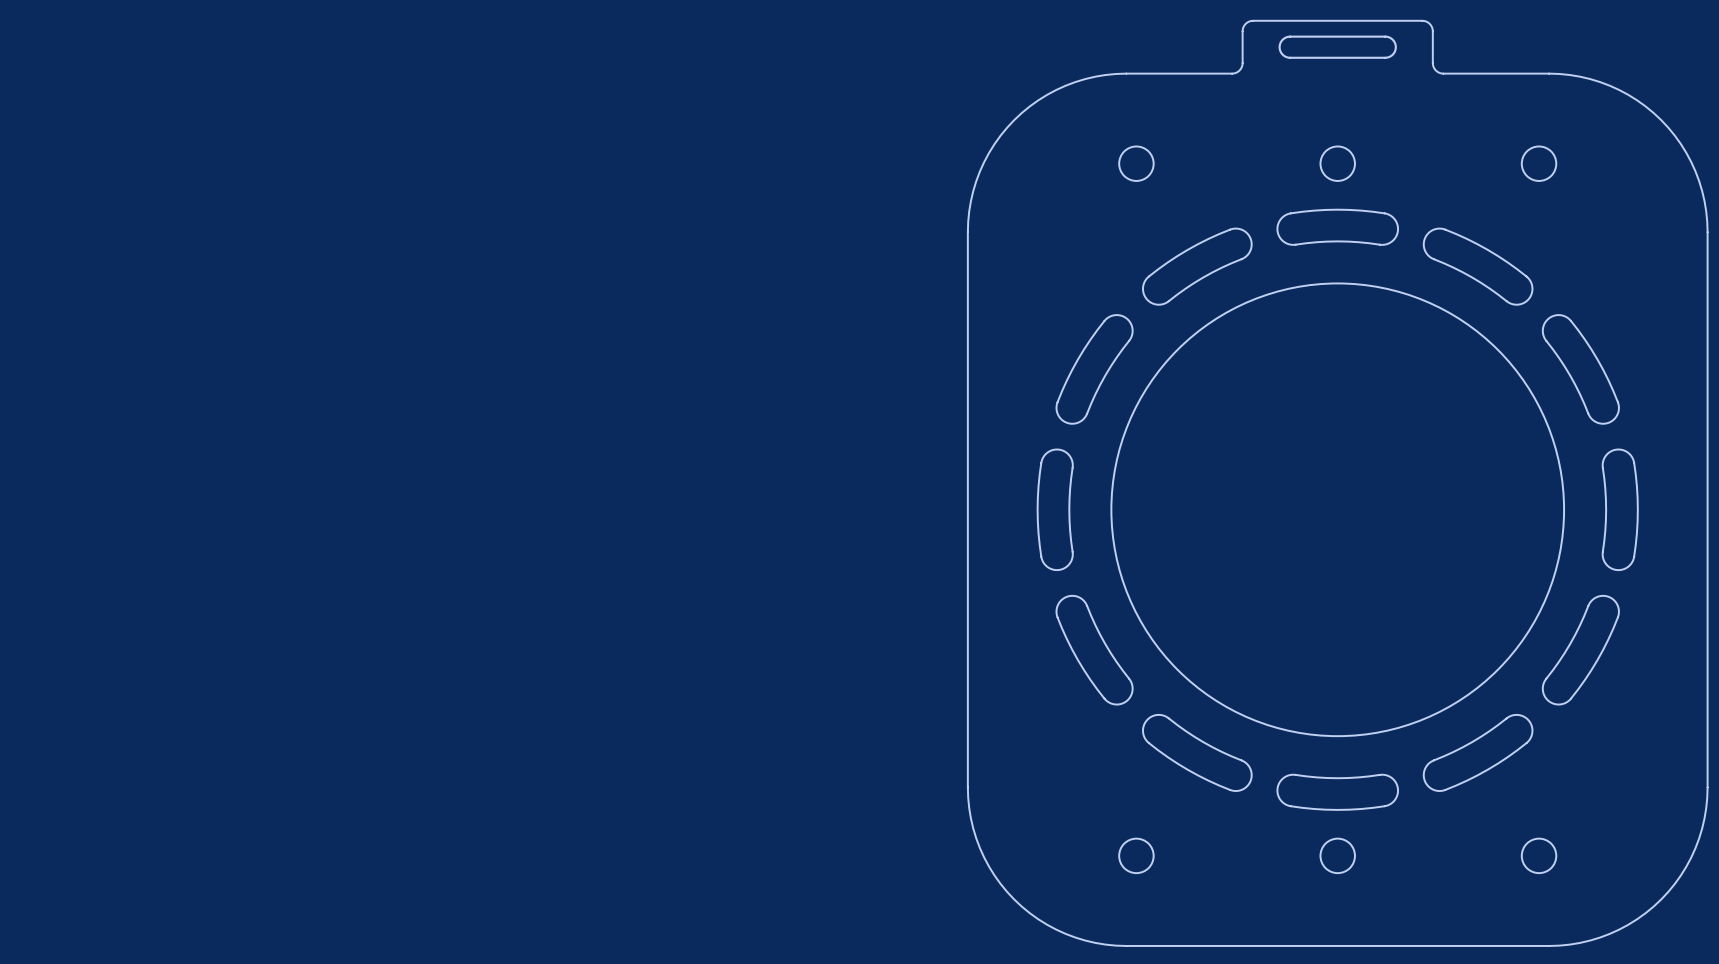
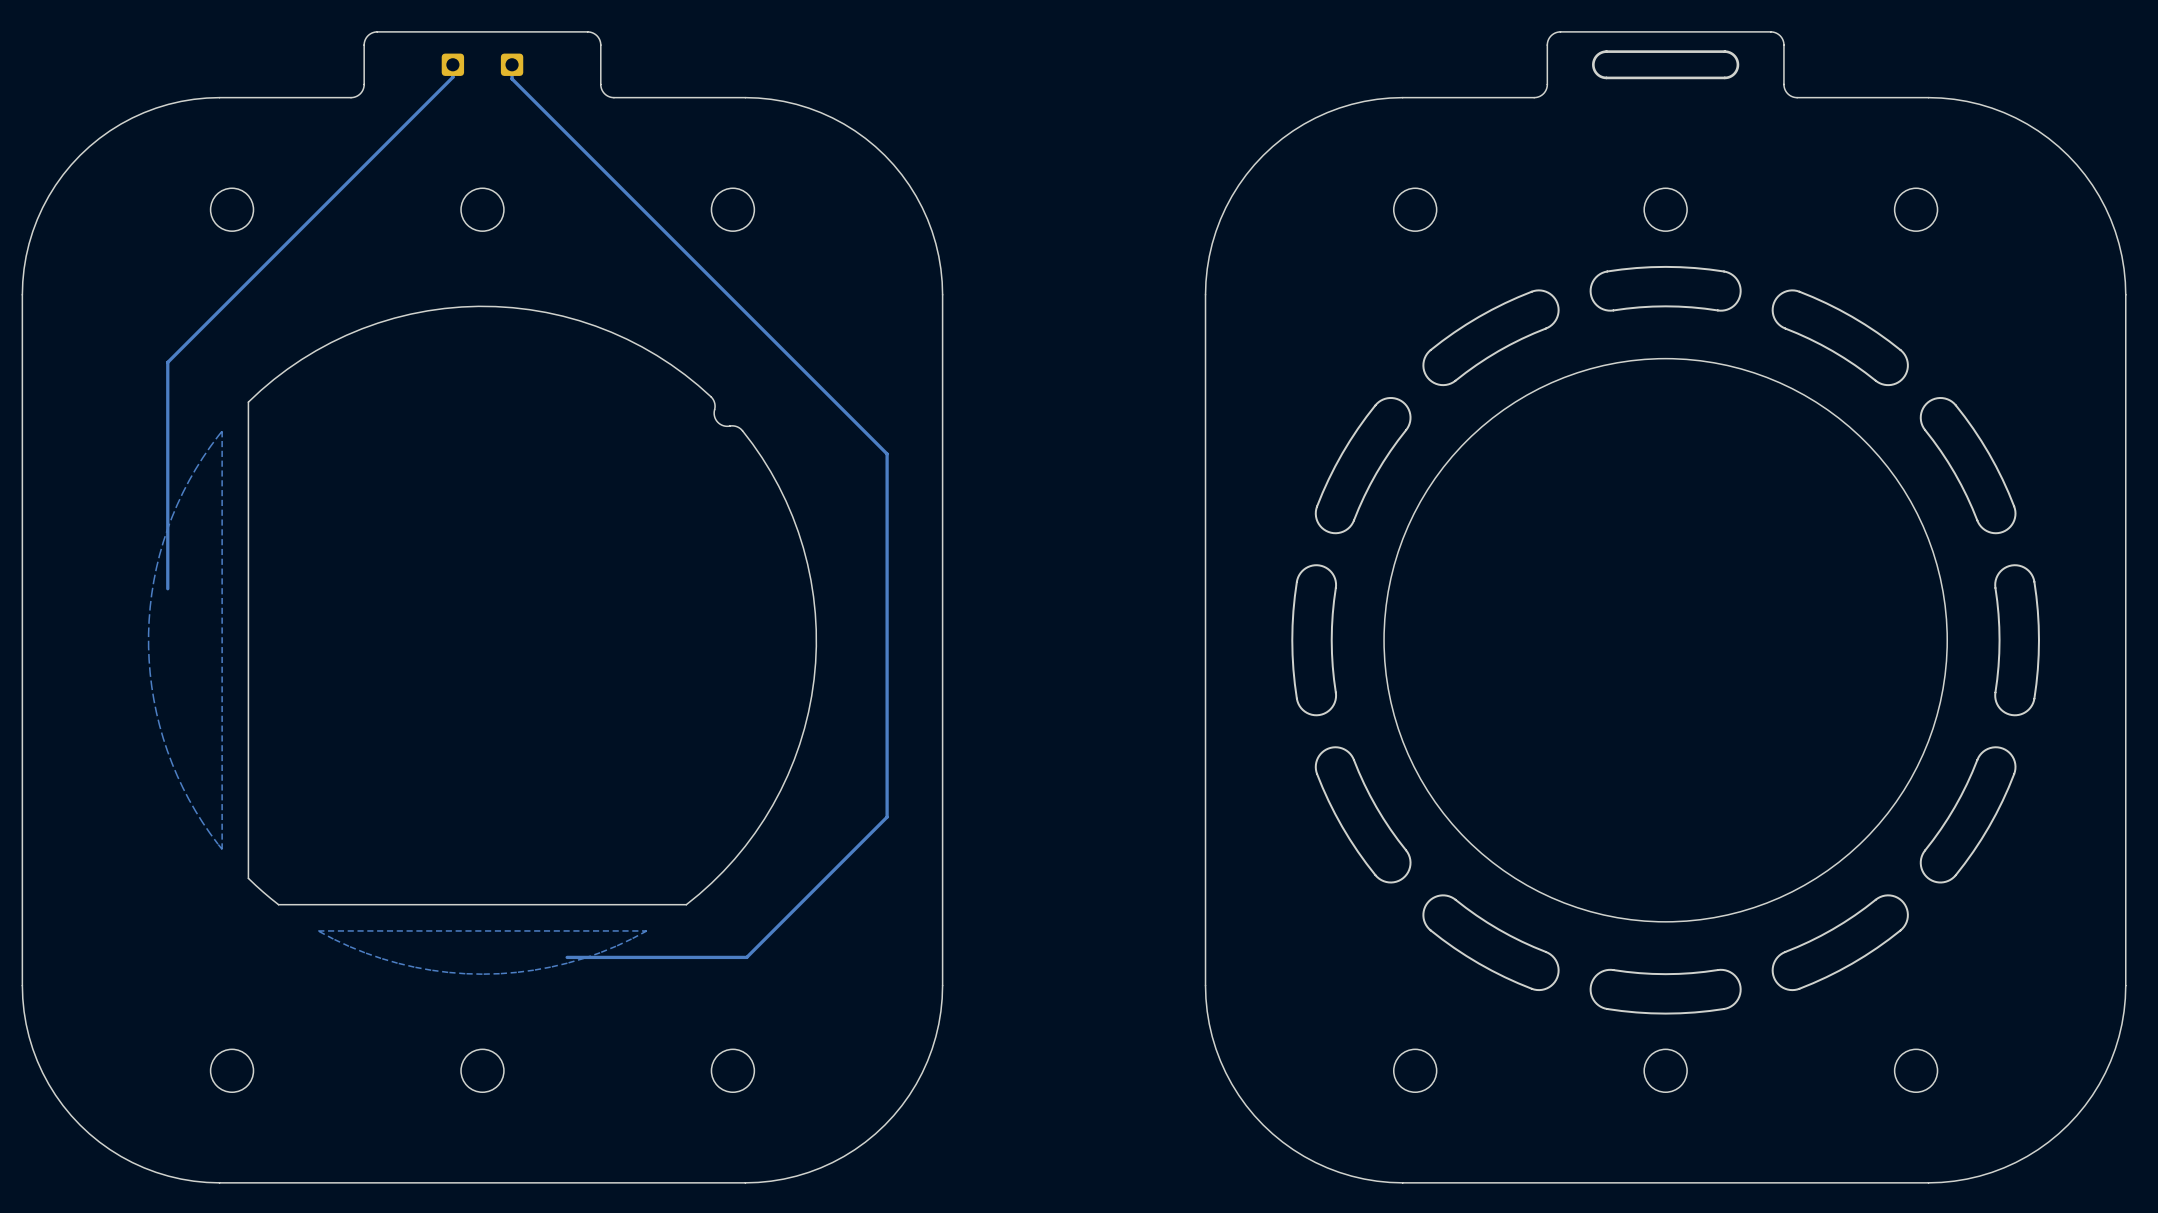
board edge: none -> (587, 31) (372, 32) (367, 36) (364, 42) (364, 85) (358, 95) (351, 97) (206, 98) (181, 101) (144, 112) (110, 130) (80, 155) (55, 185) (37, 219) (26, 256) (22, 294) (22, 985) (24, 1011) (29, 1036) (37, 1061) (48, 1084) (63, 1105) (80, 1125) (99, 1142) (120, 1156) (144, 1167) (181, 1179) (219, 1182) (745, 1182) (771, 1181) (796, 1176) (820, 1167) (844, 1156) (865, 1142) (884, 1125) (901, 1105) (916, 1084) (927, 1061) (938, 1024) (942, 985) (942, 294) (938, 256) (932, 231) (916, 196) (893, 164) (875, 146) (844, 124) (808, 108) (771, 99) (609, 96) (603, 92) (600, 85) (600, 40) (595, 34) (587, 31)
track: none -> (452, 64) (452, 77) (167, 362) (167, 588)
part: none -> (452, 64)
track: none -> (512, 64) (512, 78) (887, 453) (887, 817) (746, 957) (567, 957)
part: none -> (512, 64)
round board edge: none -> [210, 188, 254, 232]
round board edge: none -> [460, 188, 505, 232]
round board edge: none -> [711, 188, 755, 232]
board edge: none -> (710, 396) (714, 402) (714, 414) (716, 420) (723, 425) (735, 426) (742, 430) (770, 471) (786, 501) (798, 532) (807, 563) (813, 596) (816, 629) (815, 662) (811, 695) (804, 728) (794, 759) (780, 790) (764, 819) (745, 846) (723, 871) (686, 904) (278, 904) (255, 885) (248, 878) (248, 402) (287, 369) (316, 350) (346, 335) (378, 323) (411, 314) (444, 308) (478, 306) (529, 309) (562, 316) (595, 326) (626, 339) (656, 355) (684, 374) (710, 396)
zone outline: none -> (222, 431) (189, 480) (167, 529) (159, 554) (151, 593) (148, 646) (153, 699) (167, 751) (189, 799) (222, 849) (222, 431)
zone outline: none -> (646, 930) (600, 952) (567, 963) (516, 972) (482, 974) (448, 972) (397, 963) (348, 946) (318, 930) (646, 930)
round board edge: none -> [210, 1049, 254, 1093]
round board edge: none -> [460, 1049, 505, 1093]
round board edge: none -> [711, 1049, 755, 1093]

